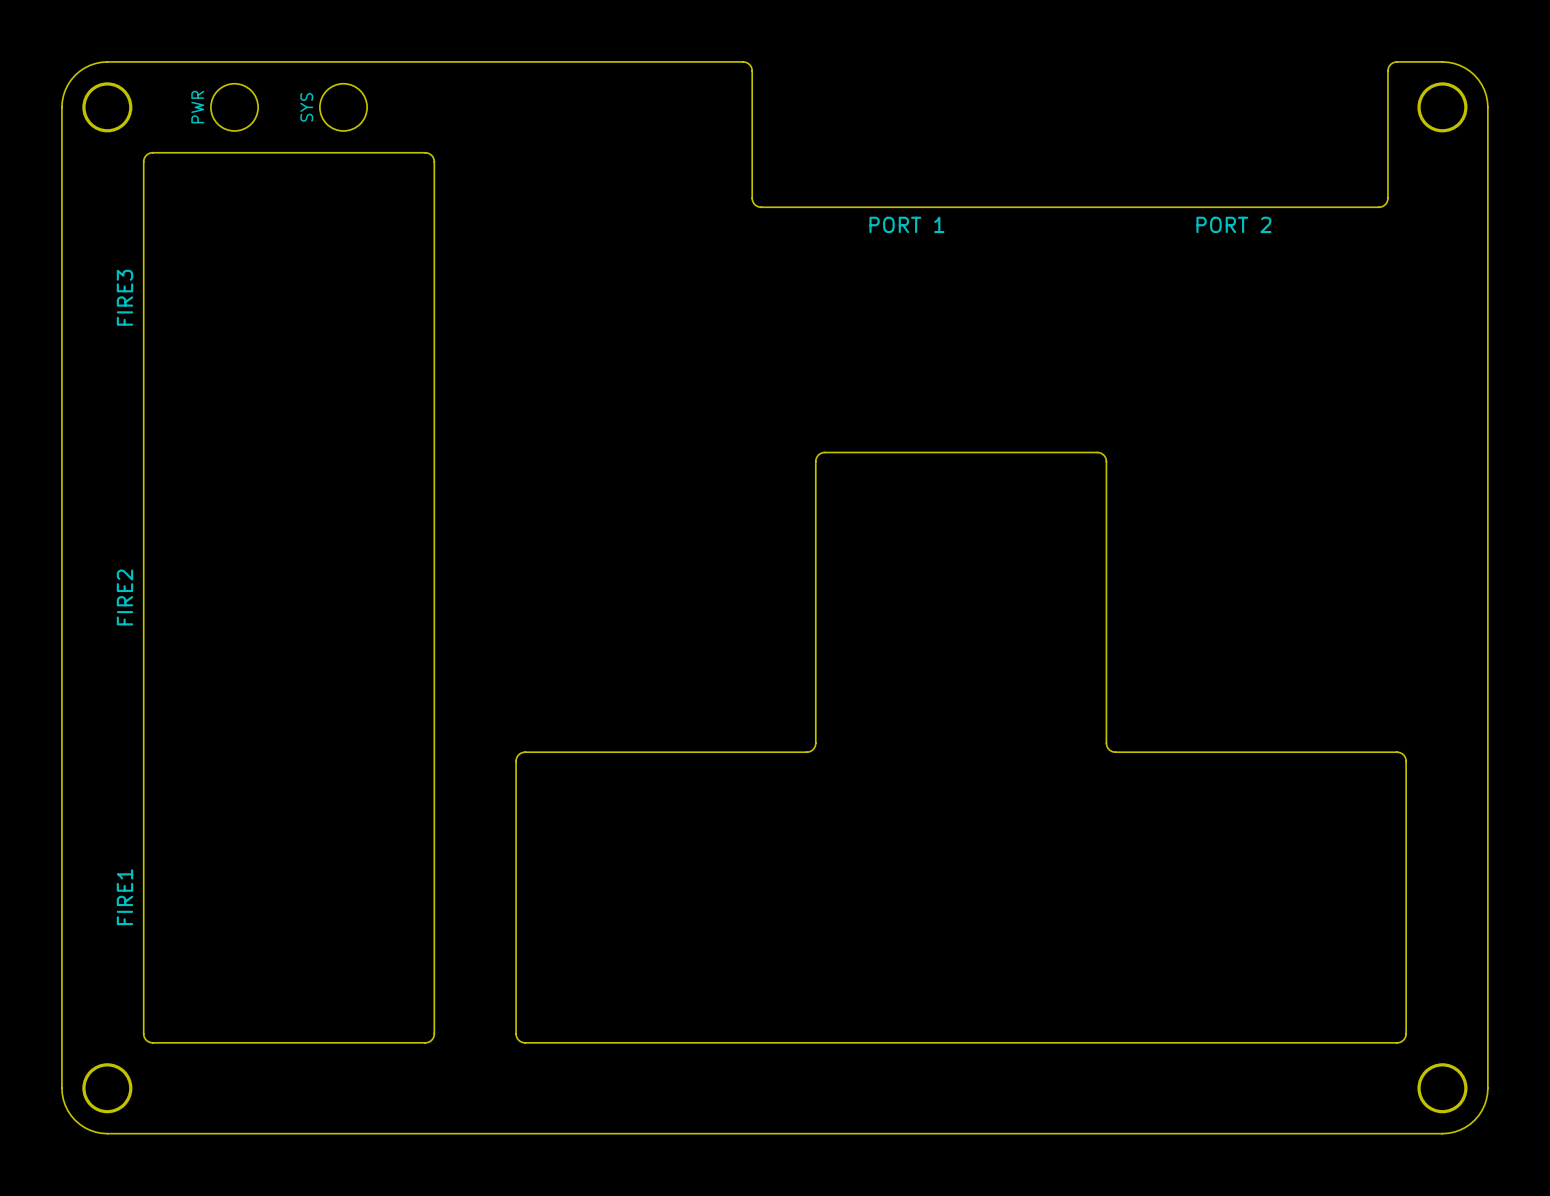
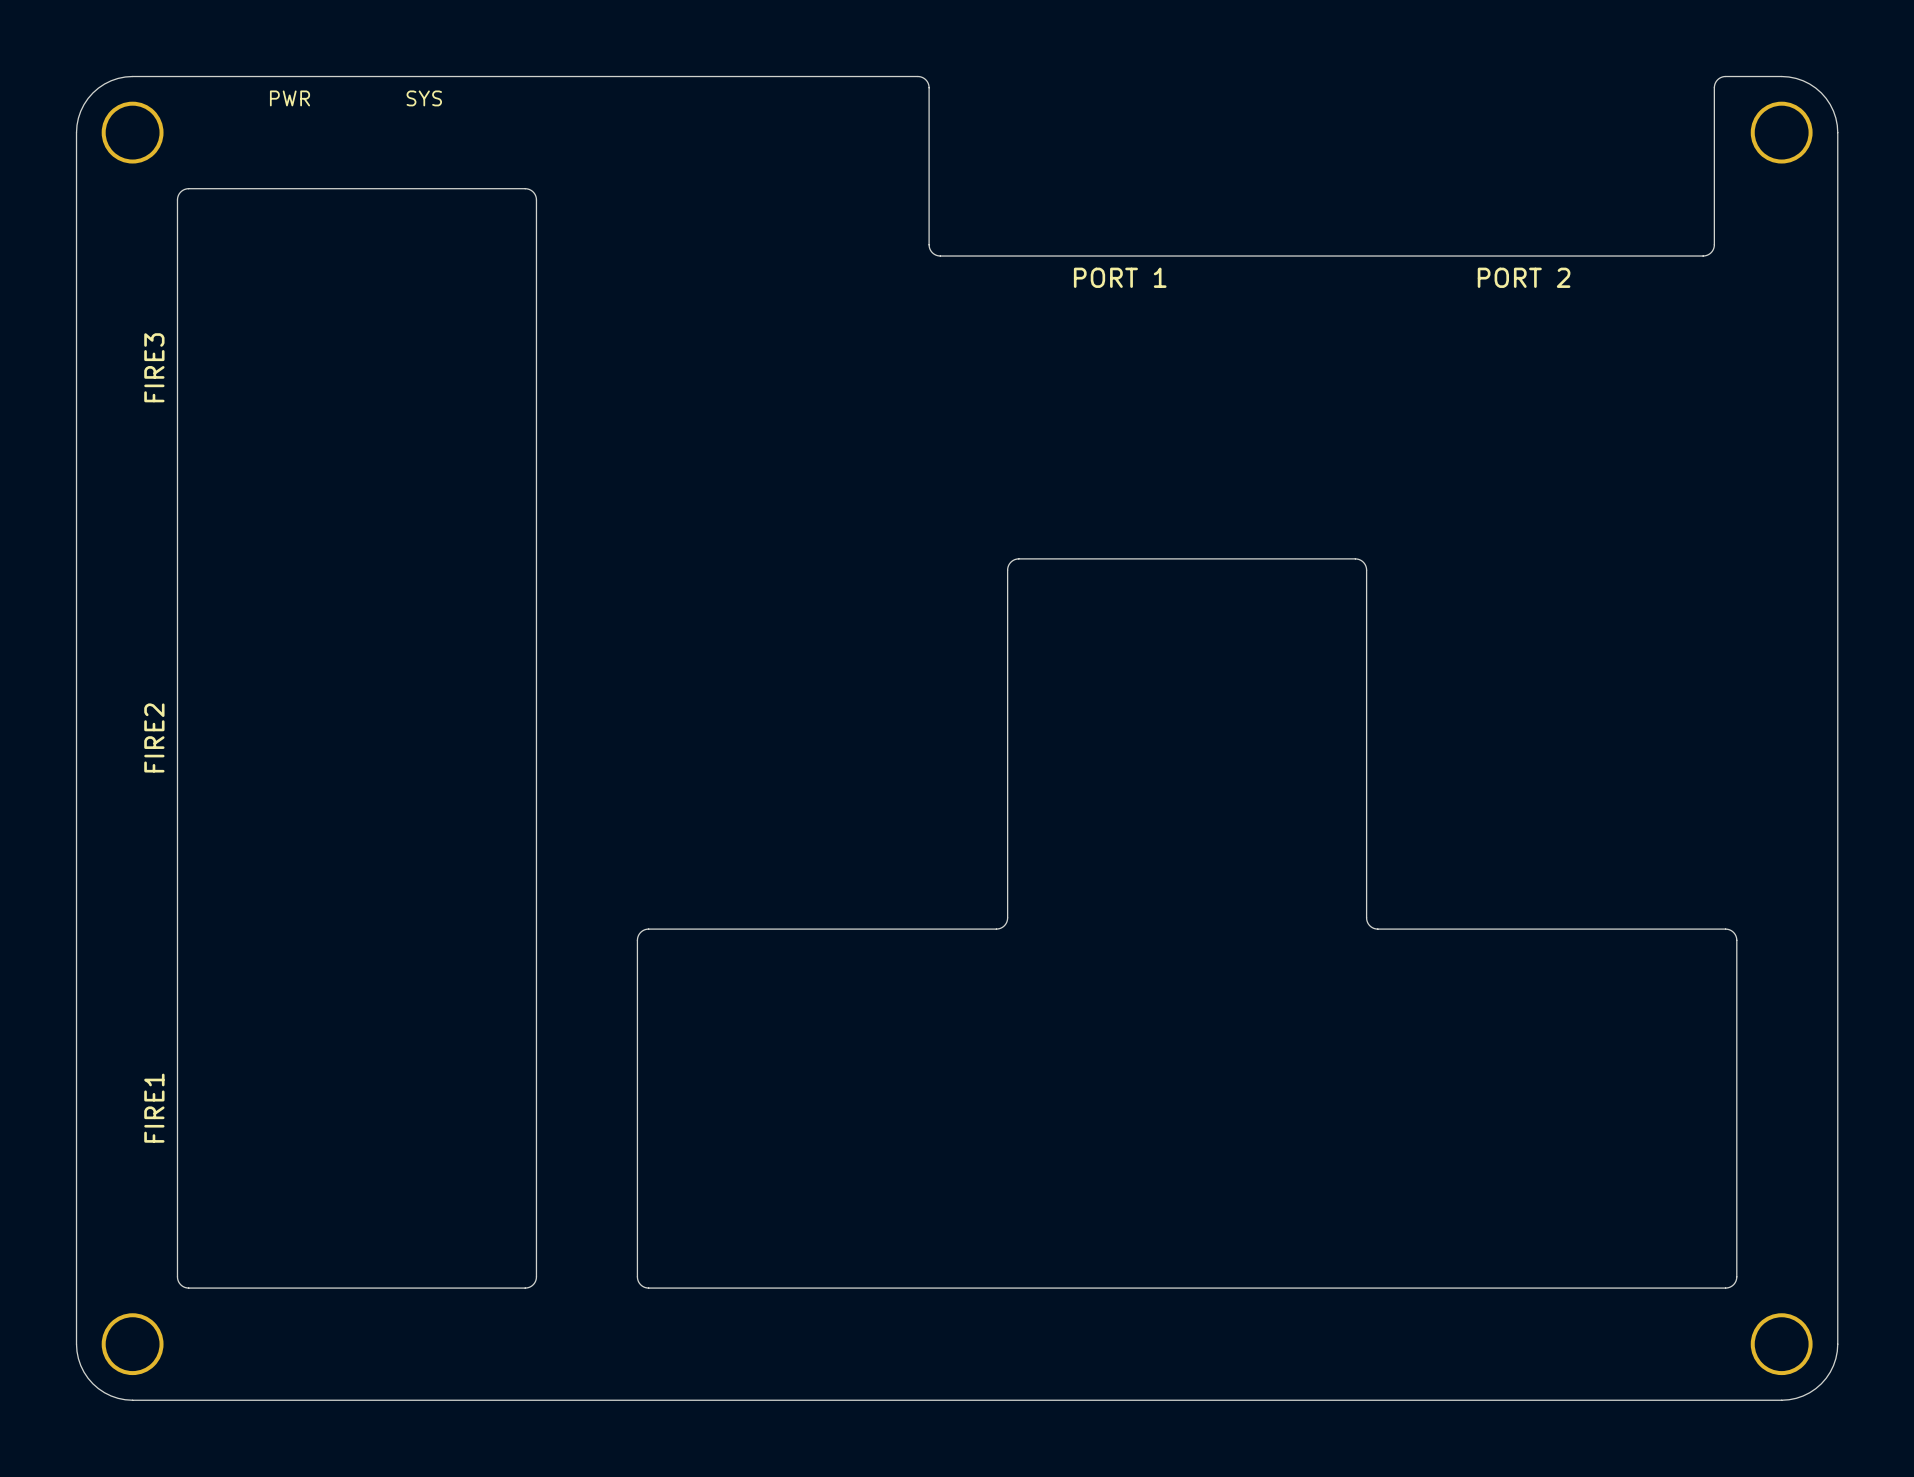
round board edge: [210, 82, 259, 132] -> none
round board edge: [319, 82, 368, 132] -> none
text rotation: 0° (197, 107) -> 90° clockwise (290, 98)
text position: PWR (197, 107) -> PWR (290, 98)
text rotation: 0° (306, 107) -> 90° clockwise (424, 98)
text position: SYS (306, 107) -> SYS (424, 98)

